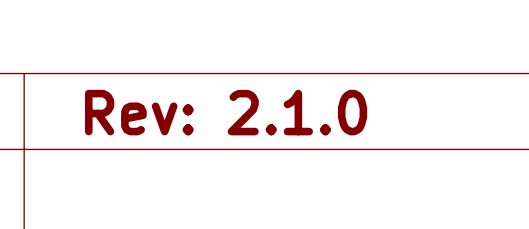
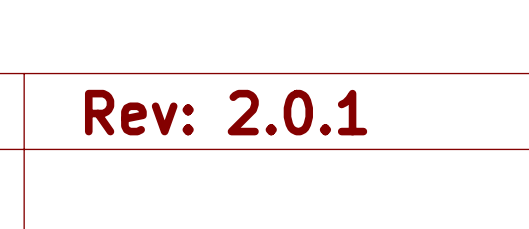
title block: Rev: 2.1.0 (226, 112) -> Rev: 2.0.1 (226, 112)

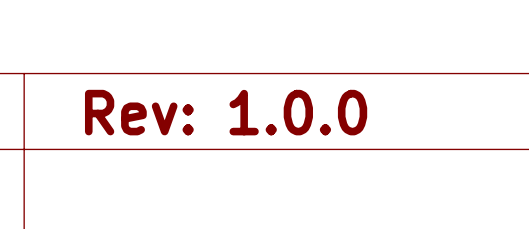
title block: Rev: 2.0.1 (226, 112) -> Rev: 1.0.0 (226, 112)

